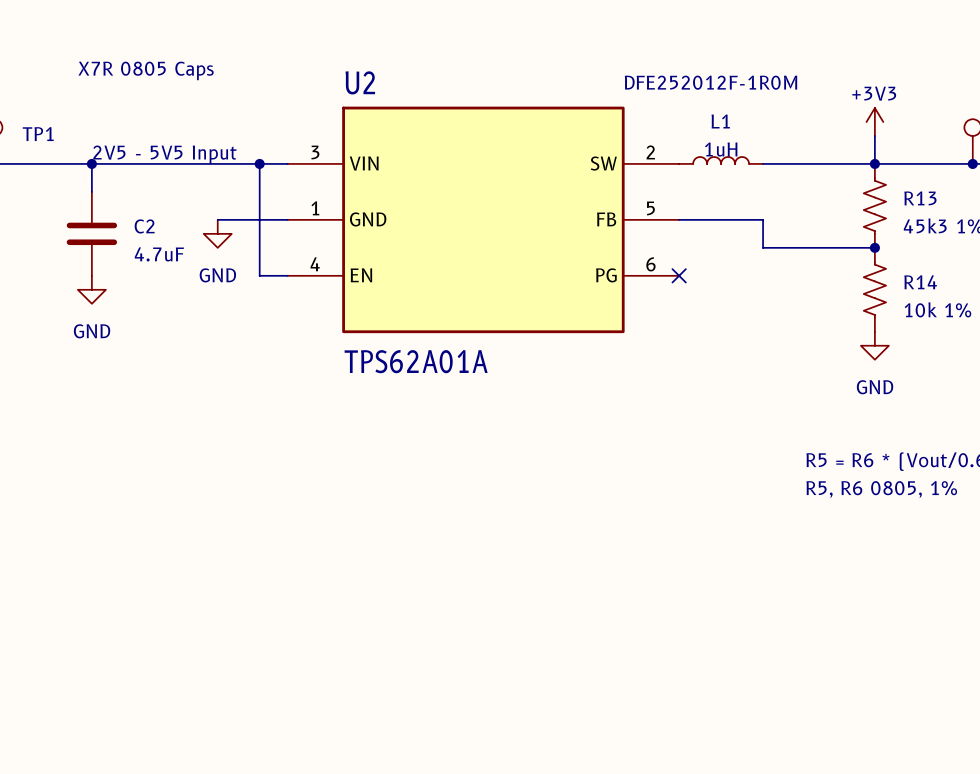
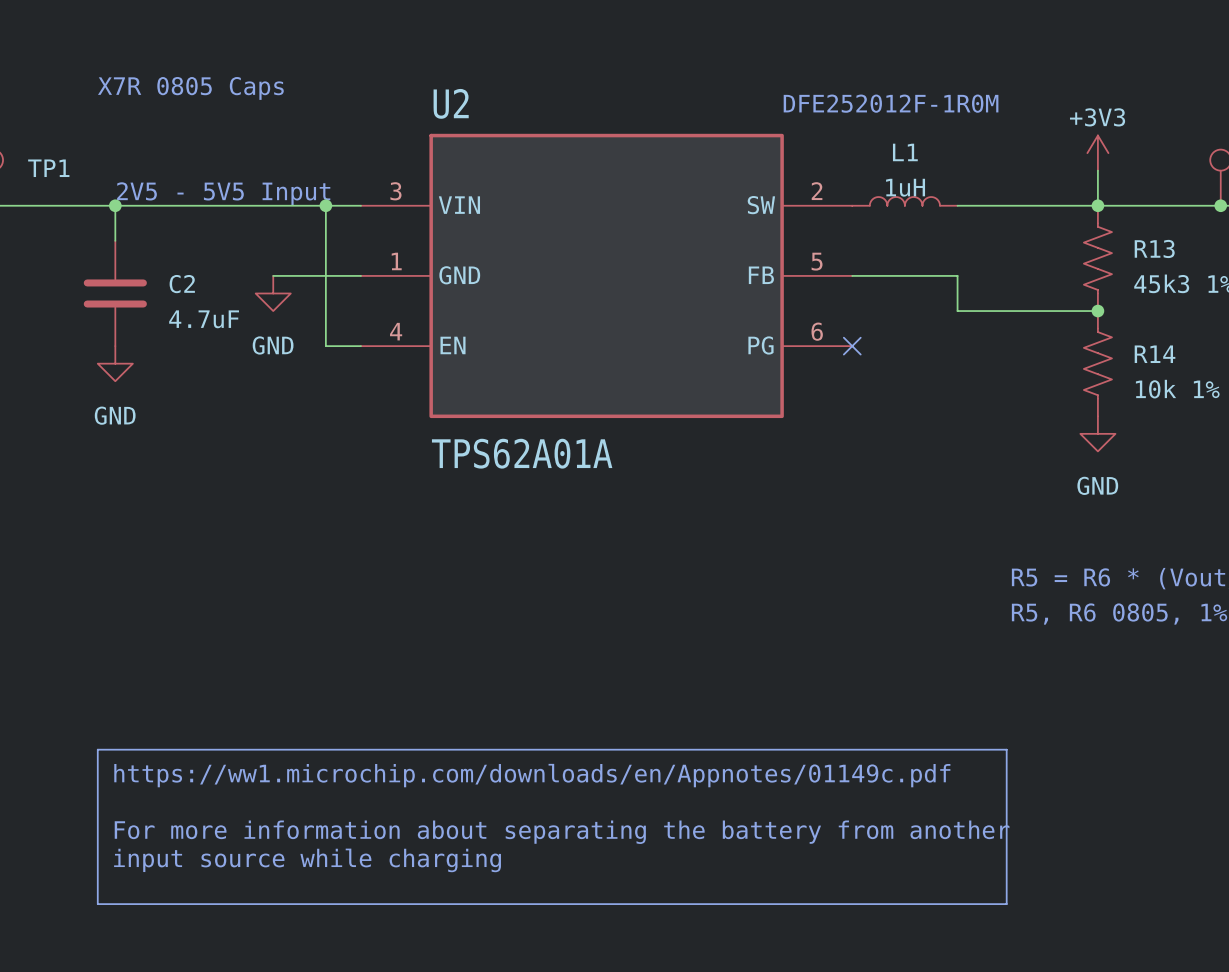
line: none -> (97, 749) (1006, 749) (1006, 904) (97, 904) (97, 749)
text: none -> https://ww1.microchip.com/downloads/en/Appnotes/01149c.pdf (532, 775)
text: none -> For more information about separating the battery from another (562, 832)
text: none -> input source while charging (307, 860)

